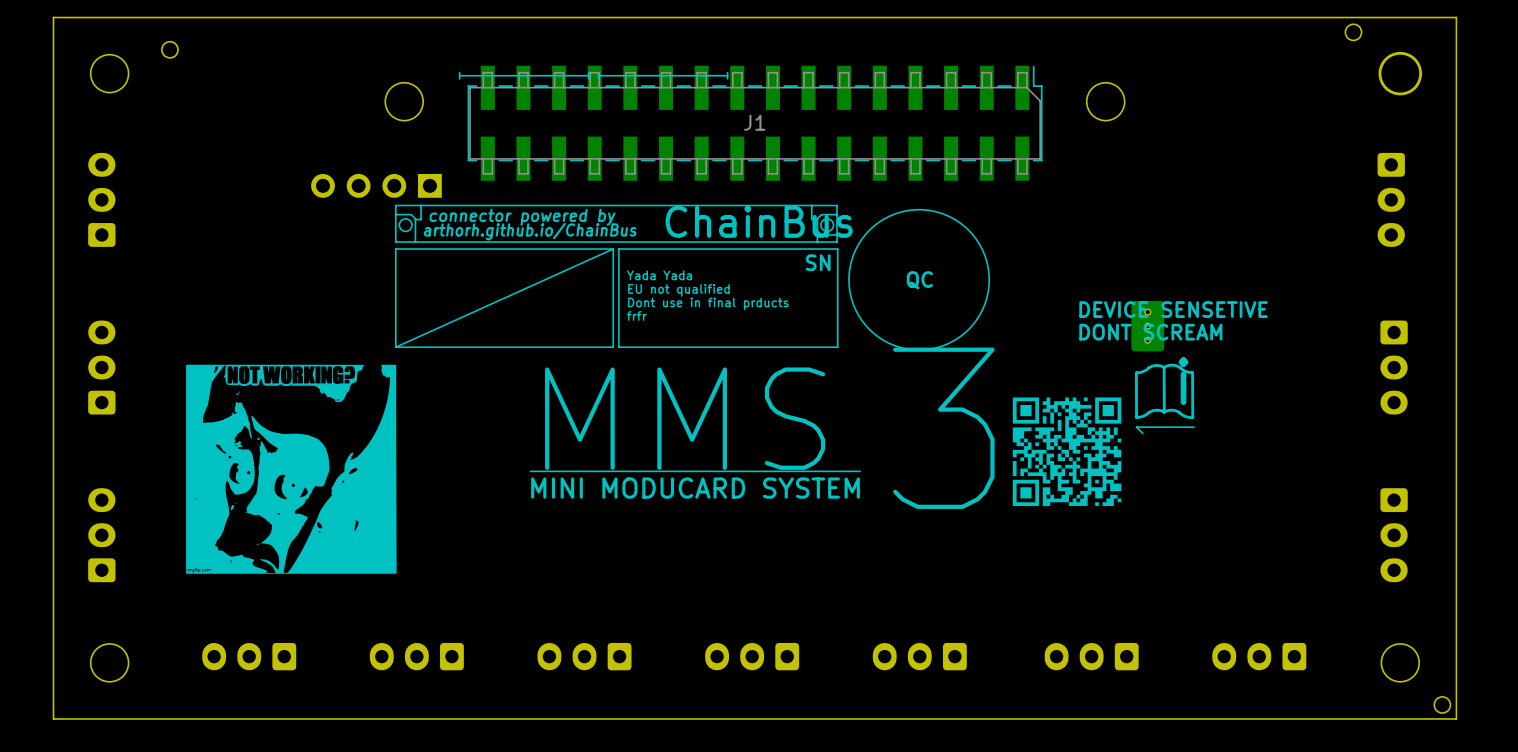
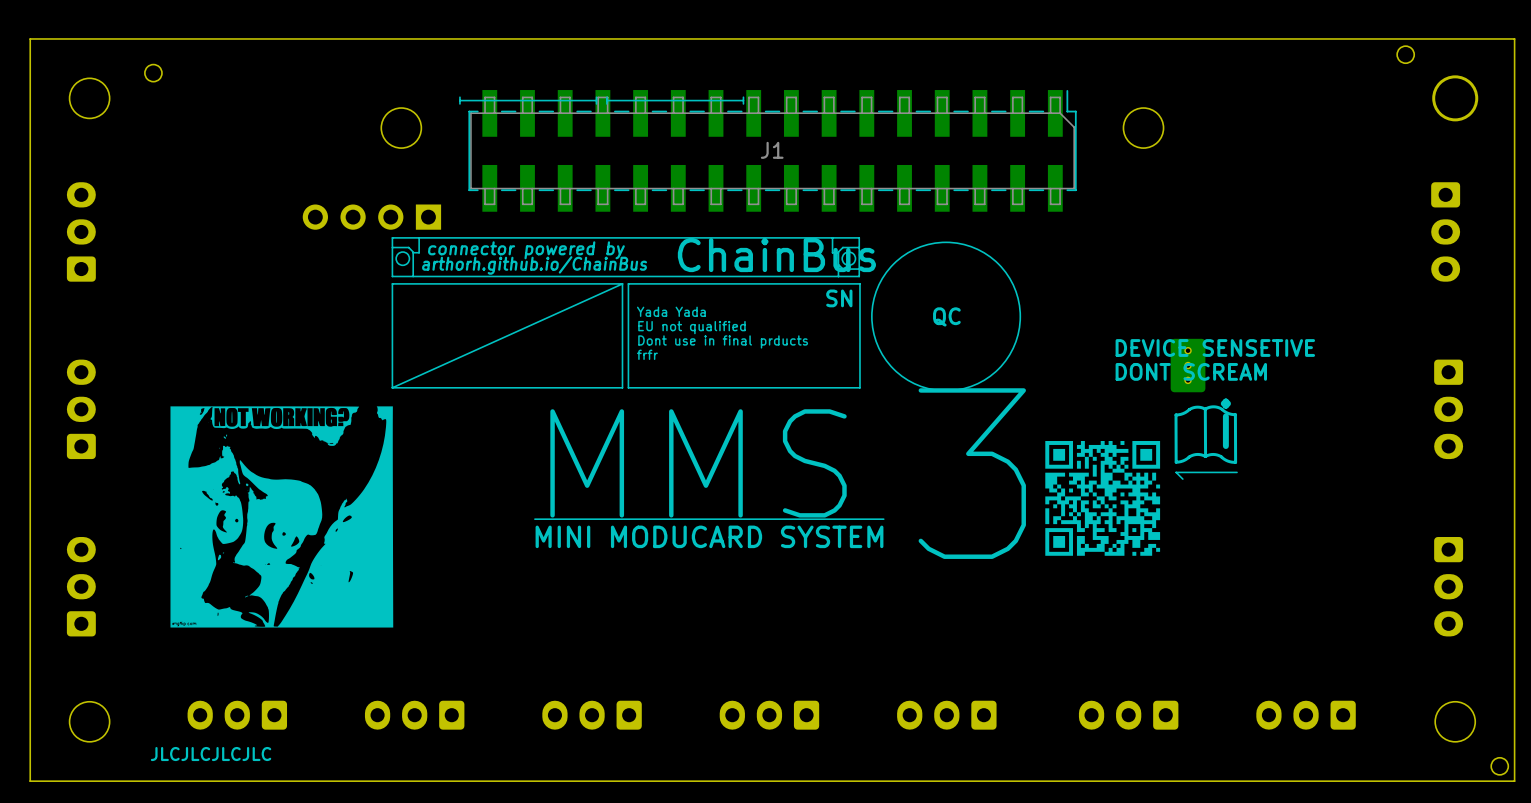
drawing: none -> [150, 746, 272, 762]

